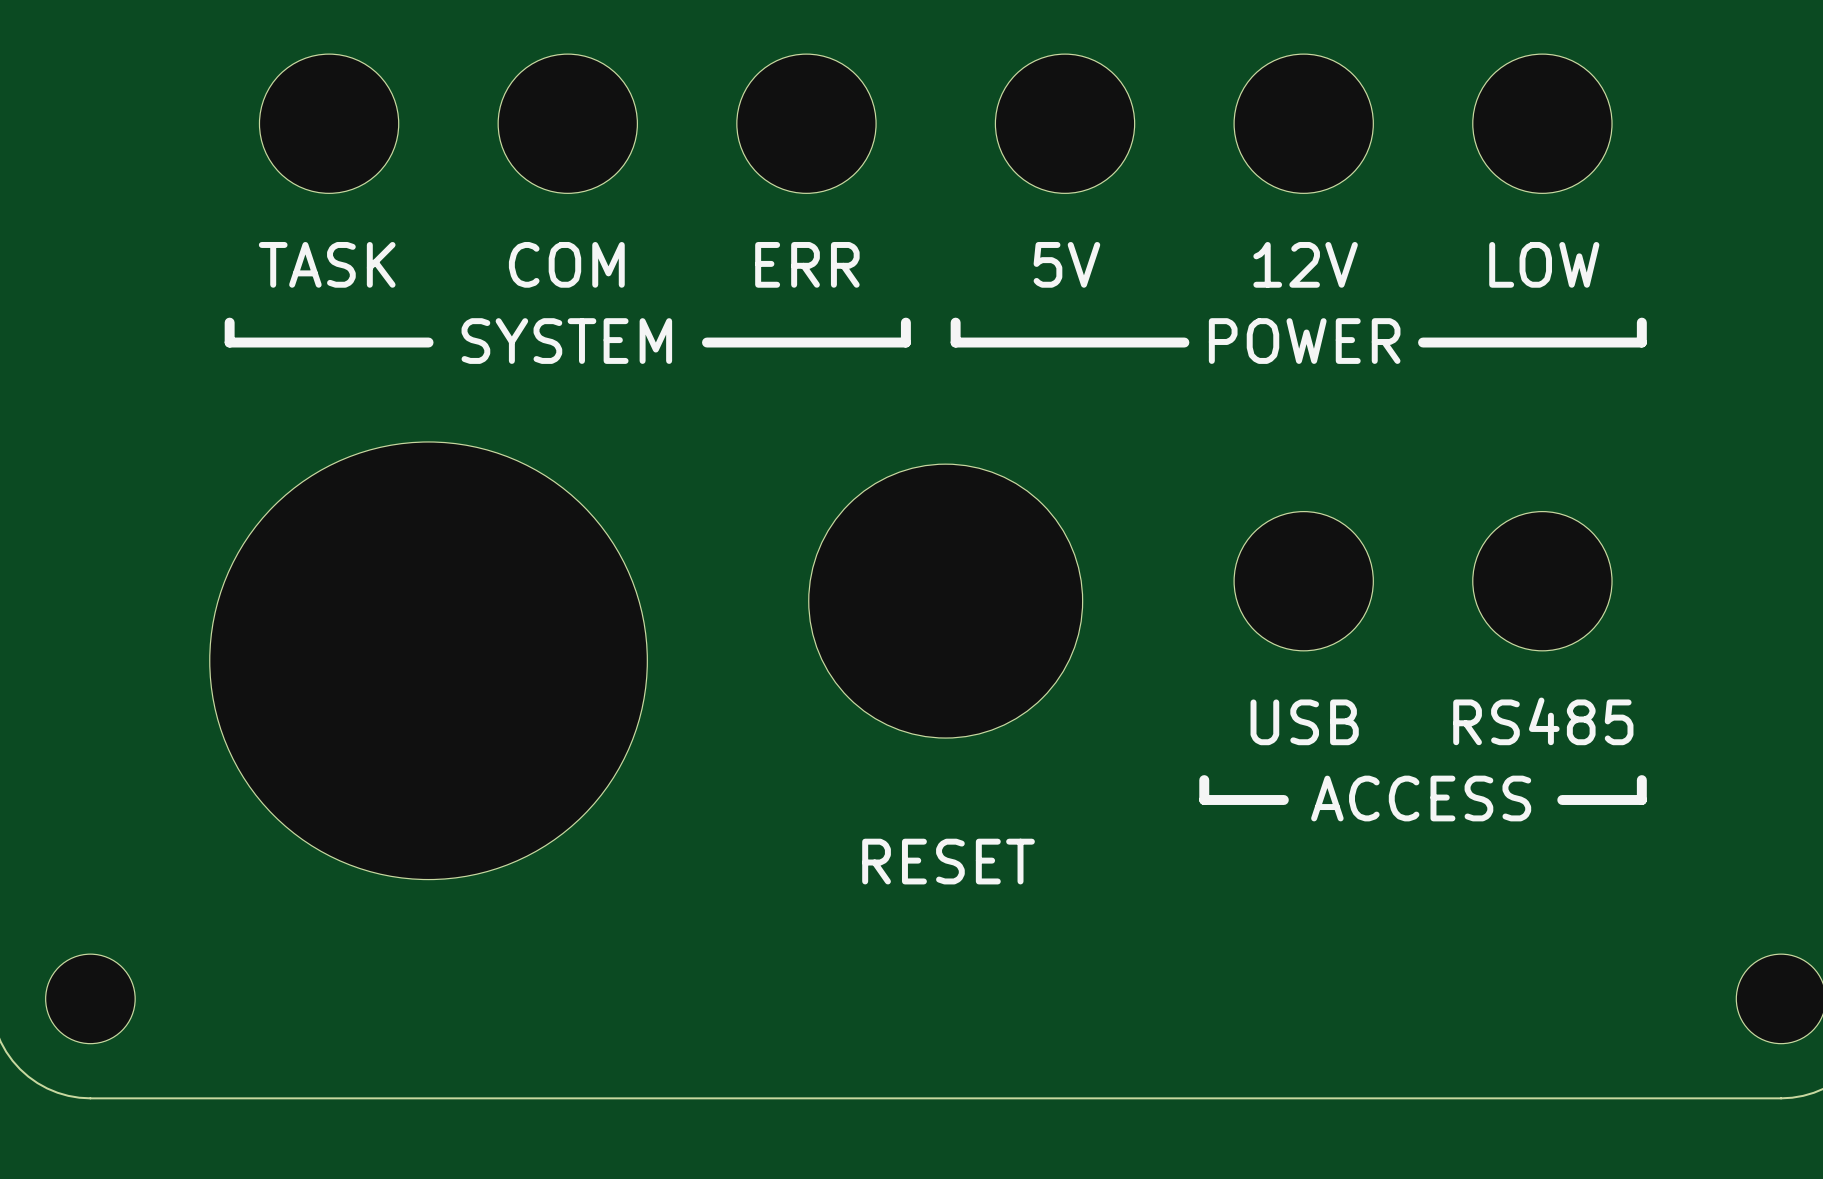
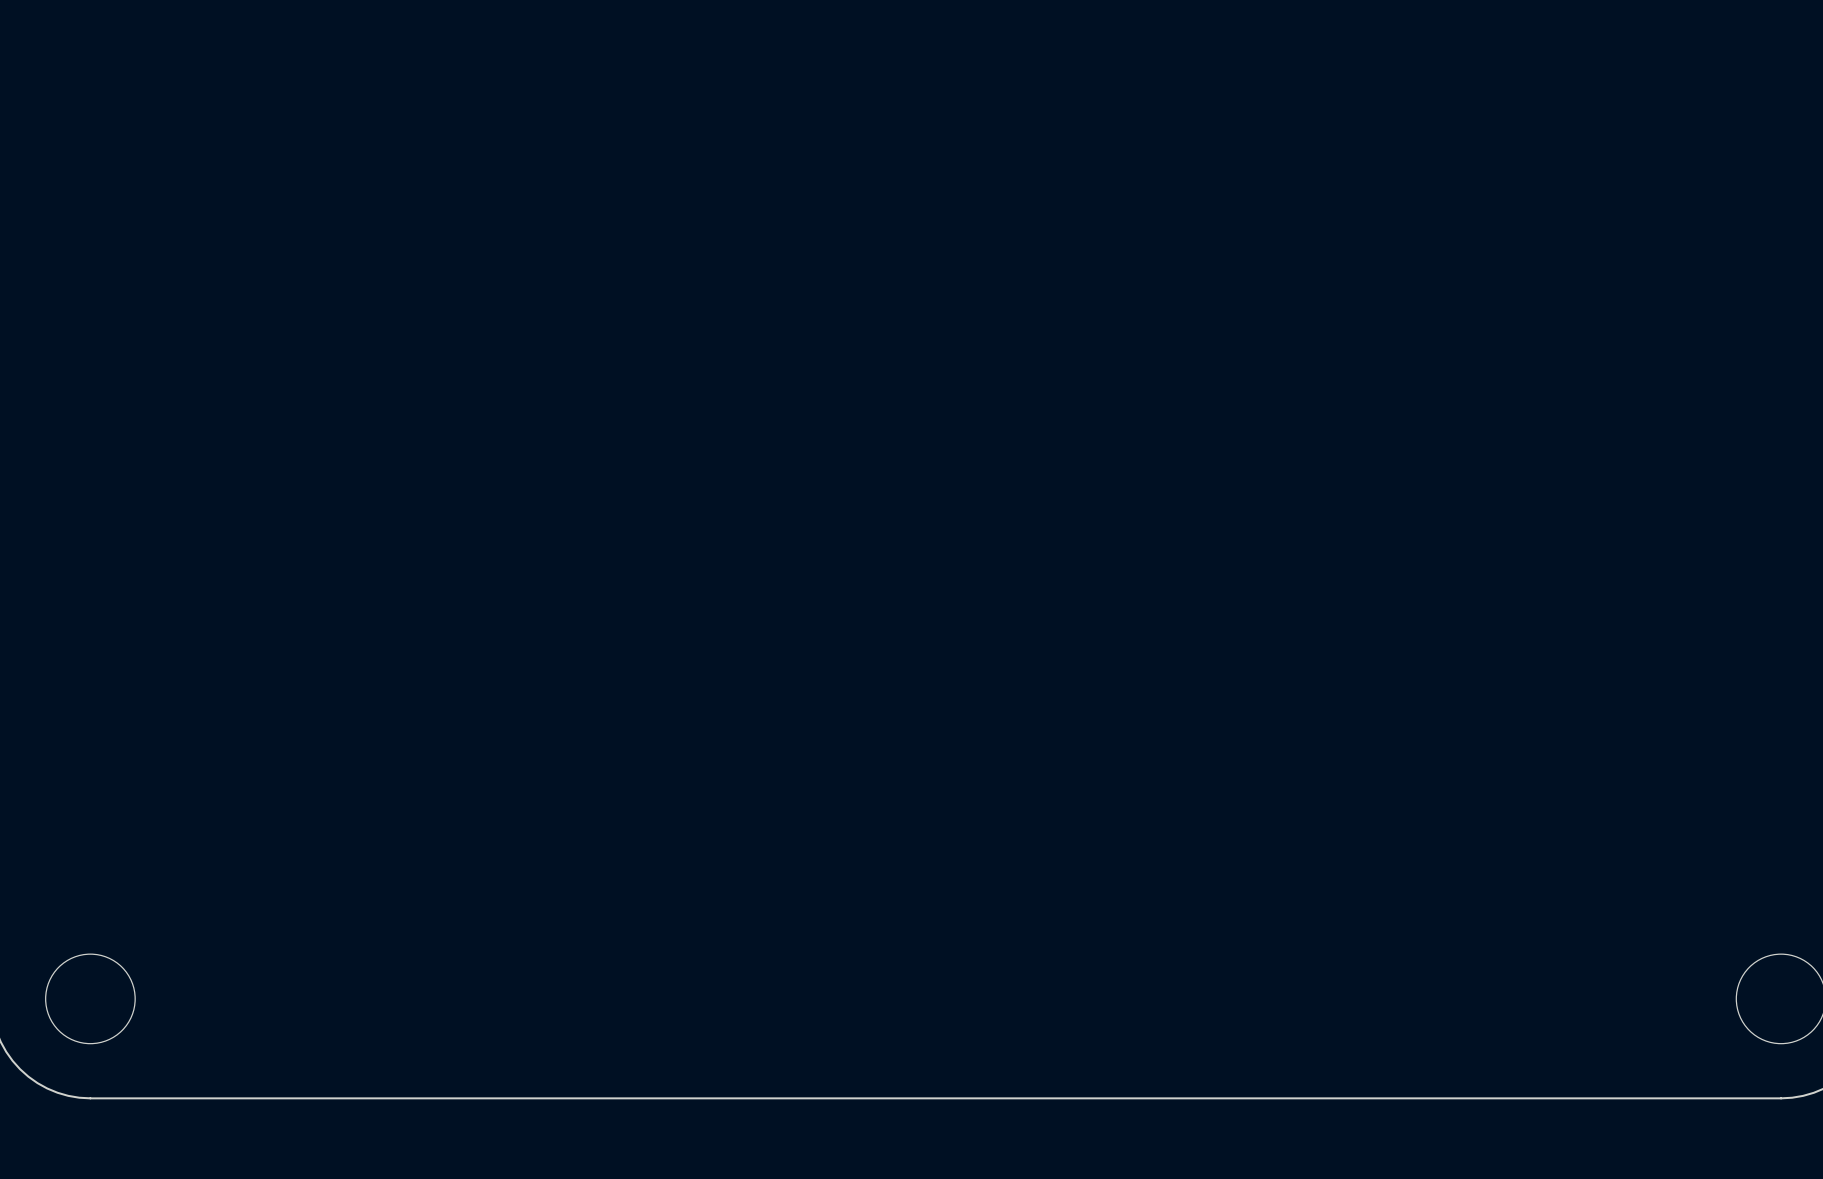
part: (329, 123) -> none
part: (567, 123) -> none
part: (806, 123) -> none
part: (1065, 123) -> none
part: (1303, 123) -> none
part: (1542, 123) -> none
text: TASK (327, 264) -> none
text: COM (566, 264) -> none
text: ERR (807, 264) -> none
text: 5V (1066, 264) -> none
text: 12V (1305, 264) -> none
text: LOW (1544, 264) -> none
line: (229, 322) (229, 342) (428, 342) -> none
line: (905, 322) (905, 342) (707, 342) -> none
line: (955, 322) (955, 342) (1184, 342) -> none
line: (1641, 322) (1641, 342) (1423, 342) -> none
text: SYSTEM (566, 341) -> none
text: POWER (1304, 341) -> none
part: (1303, 581) -> none
part: (1542, 581) -> none
part: (945, 601) -> none
part: (428, 660) -> none
text: RS485 (1543, 721) -> none
text: USB (1304, 722) -> none
line: (1204, 780) (1204, 800) (1283, 800) -> none
line: (1641, 780) (1641, 800) (1562, 800) -> none
text: ACCESS (1421, 798) -> none
text: RESET (948, 861) -> none

